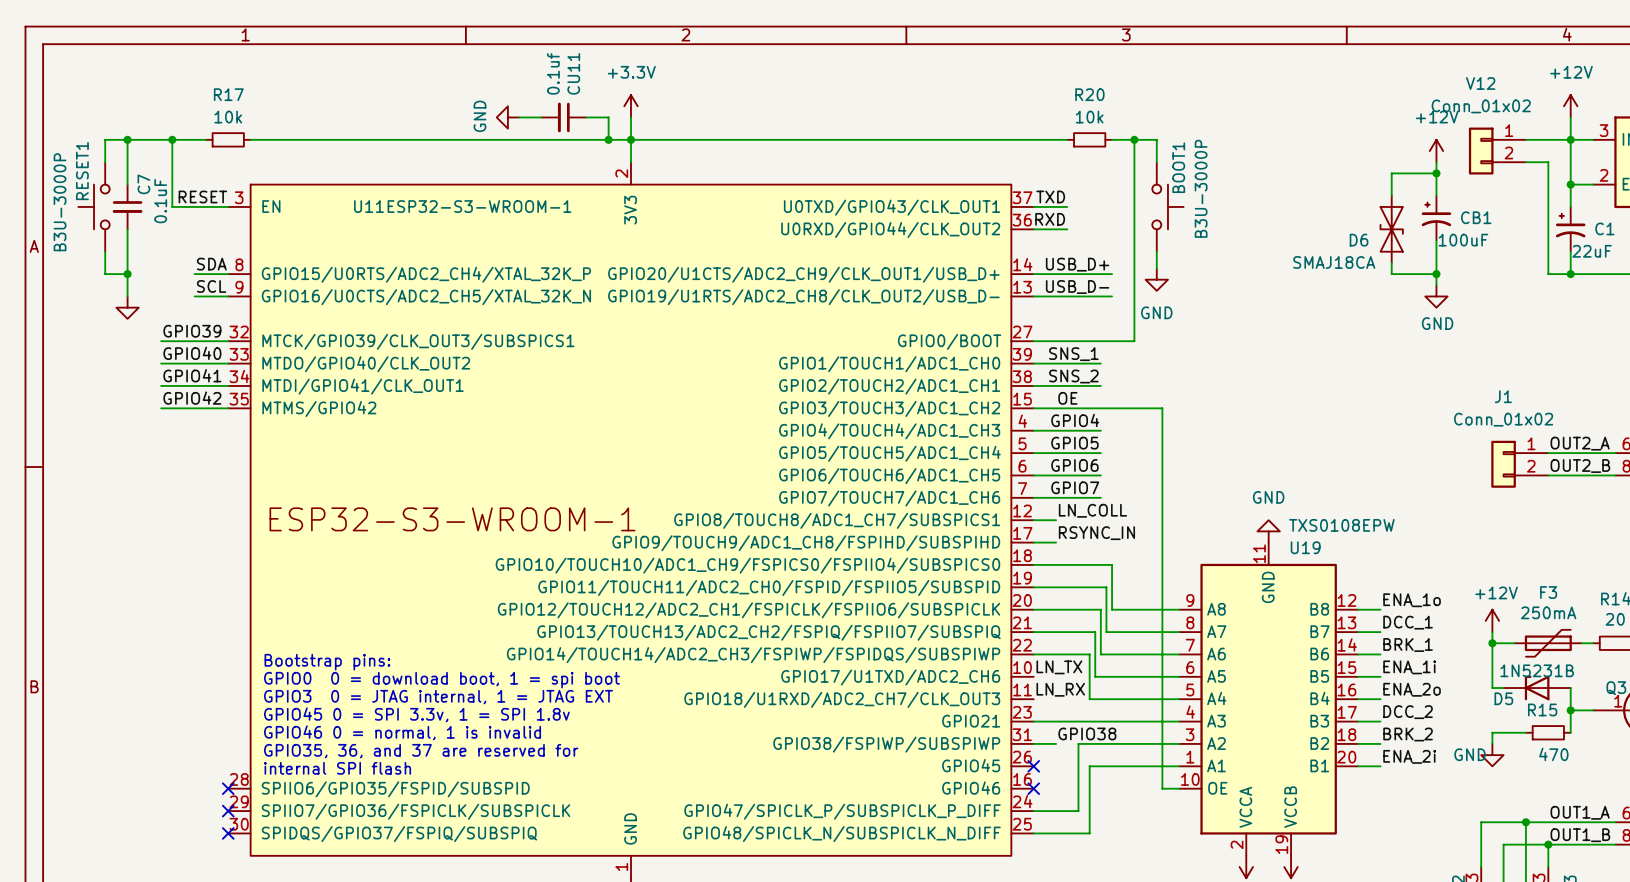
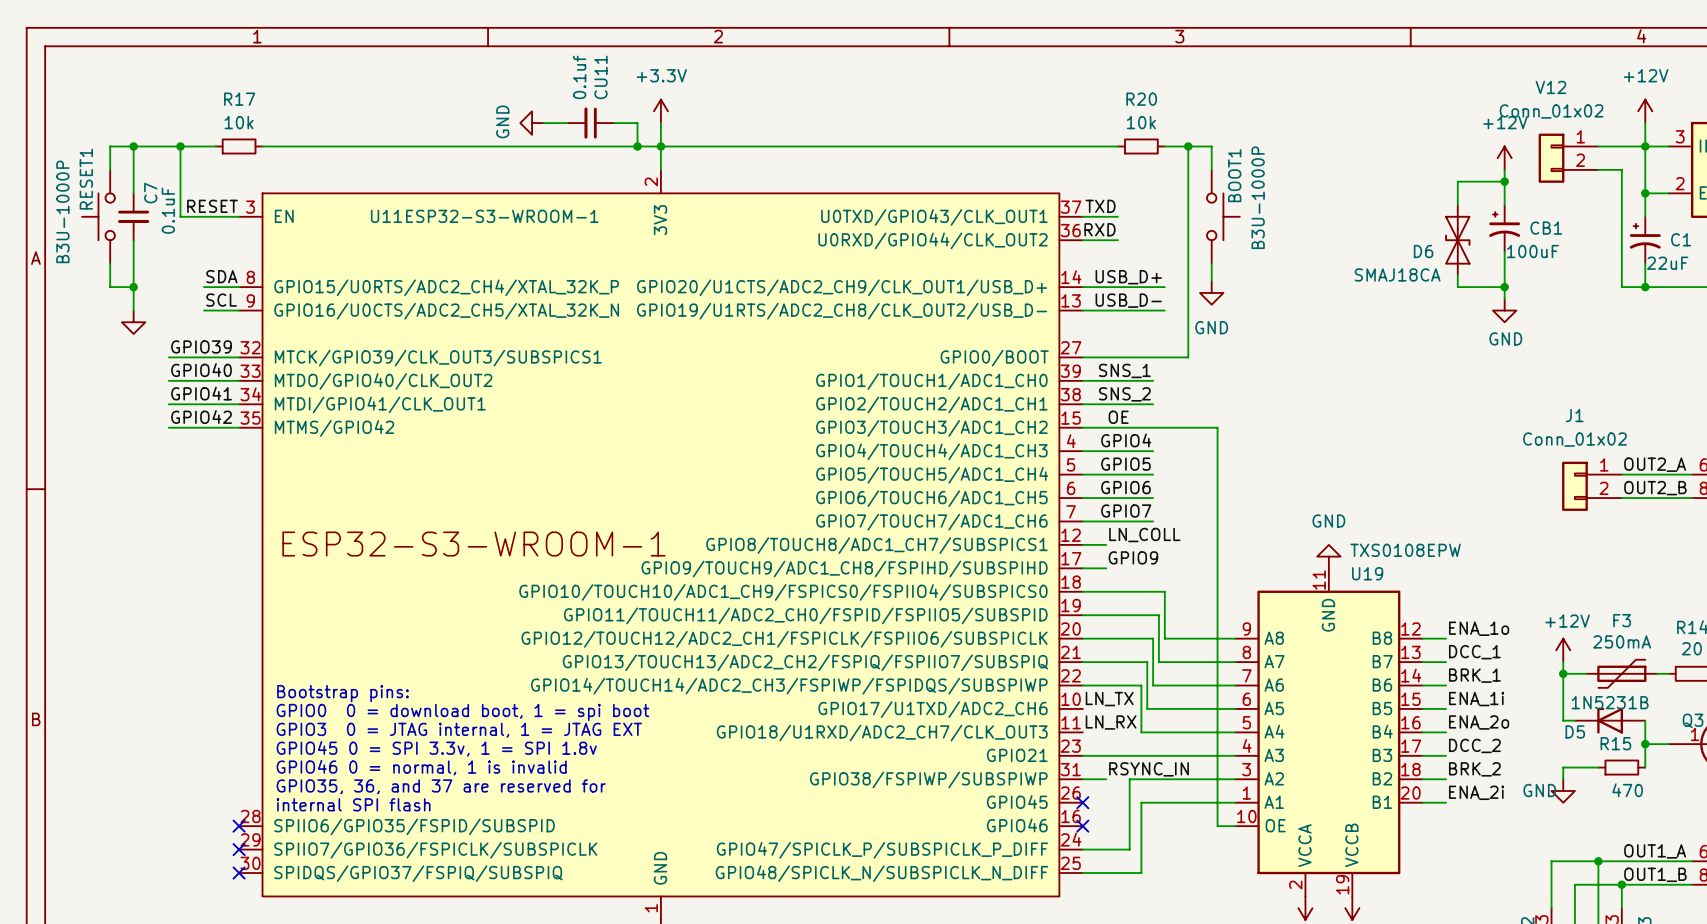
BOOT1 value: B3U-3000P (1201, 188) -> B3U-1000P (1258, 197)
RESET1 value: B3U-3000P (60, 202) -> B3U-1000P (62, 211)
label: RSYNC_IN (1096, 533) -> GPIO9 (1133, 557)
label: GPIO38 (1087, 733) -> RSYNC_IN (1149, 769)

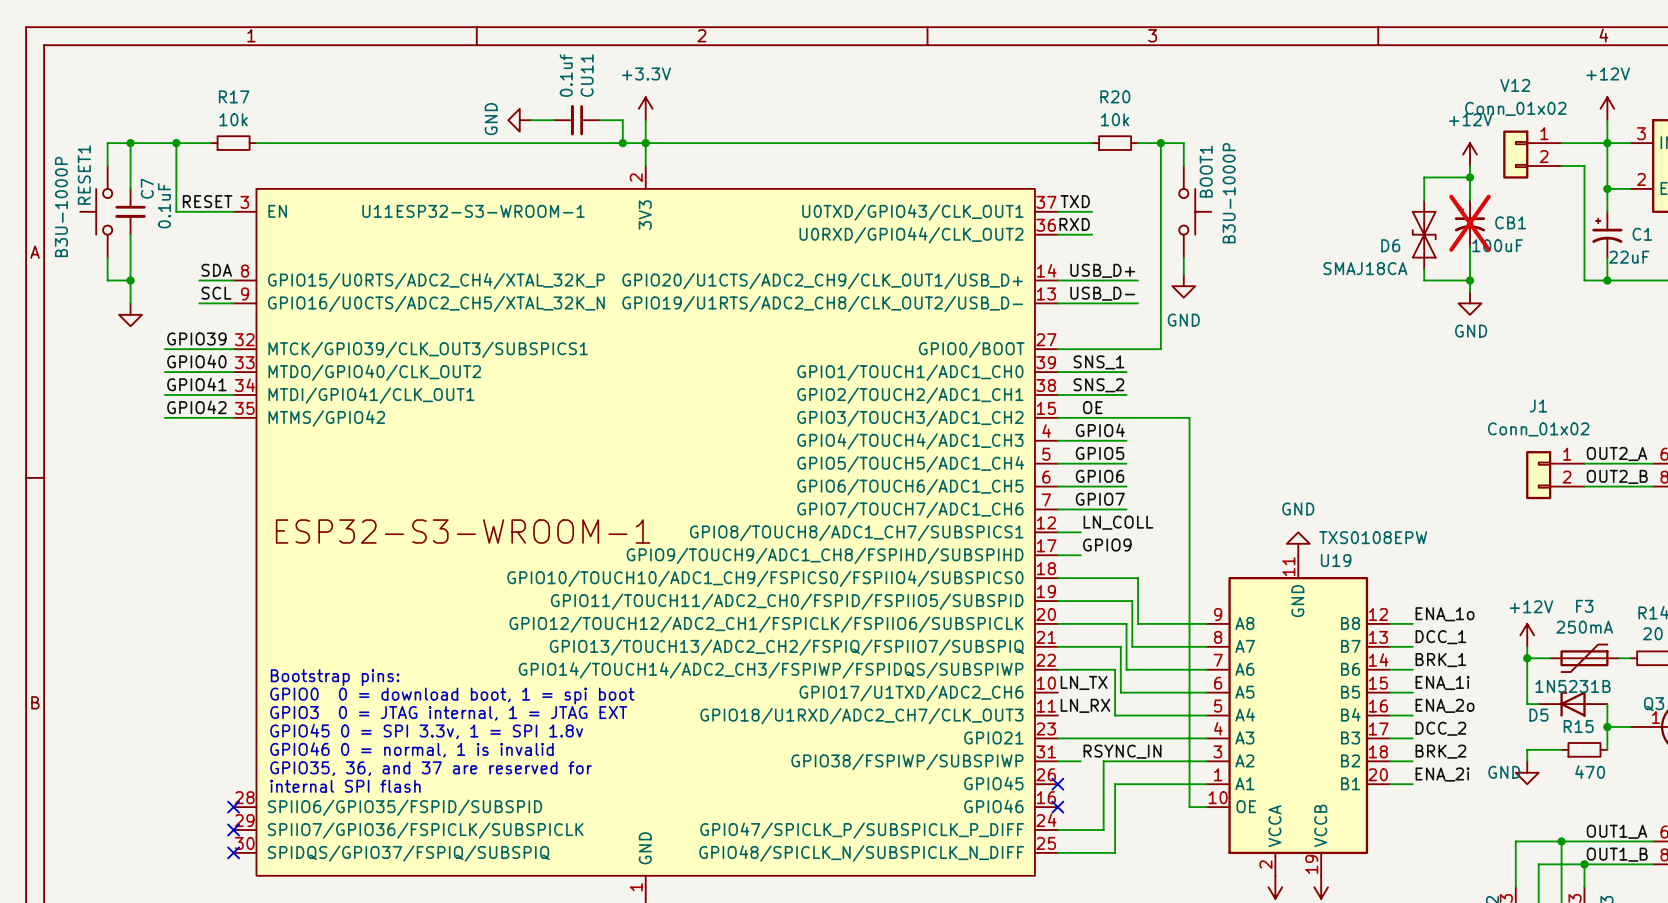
CB1 do-not-place cross: none -> (1469, 223)

